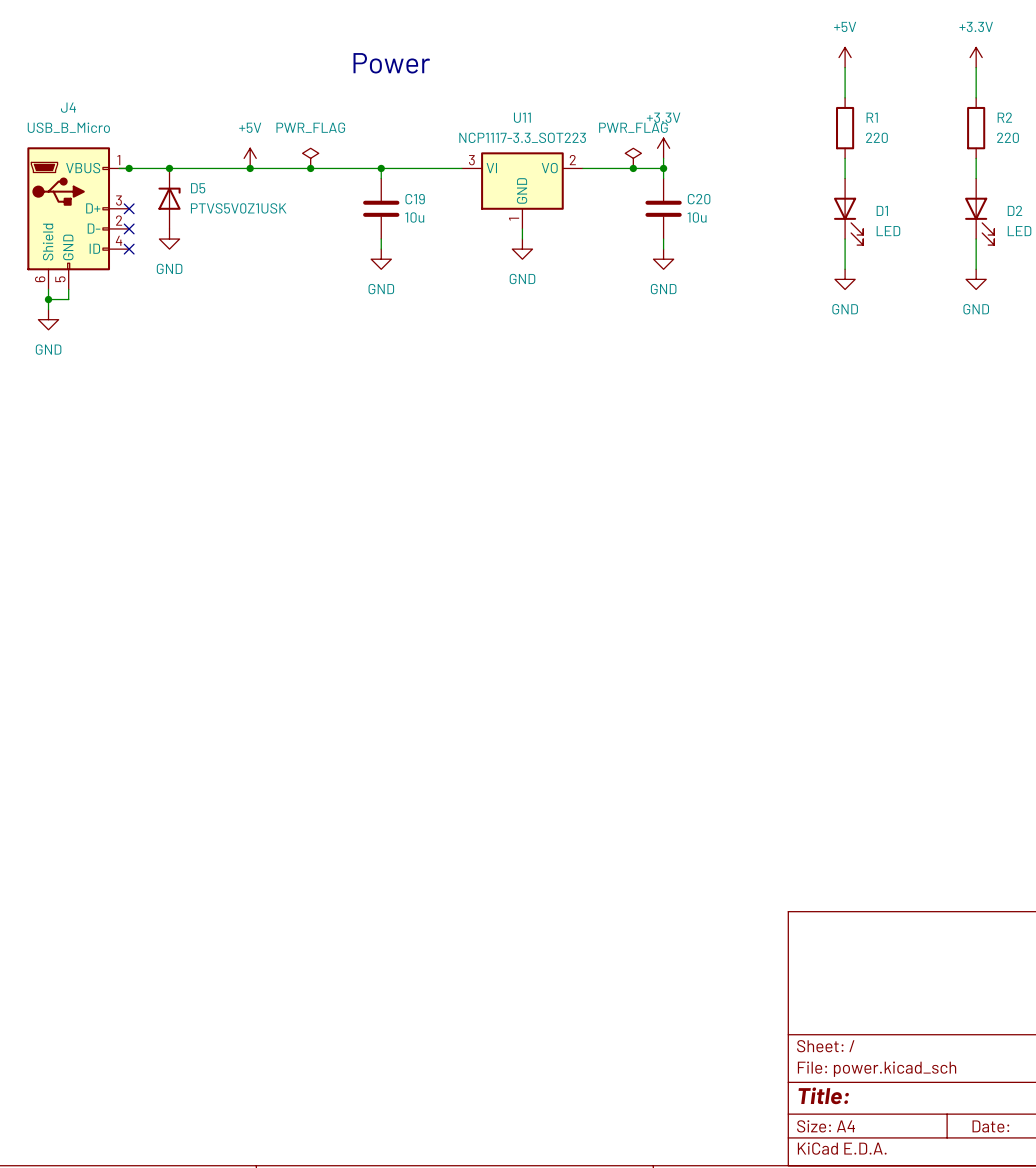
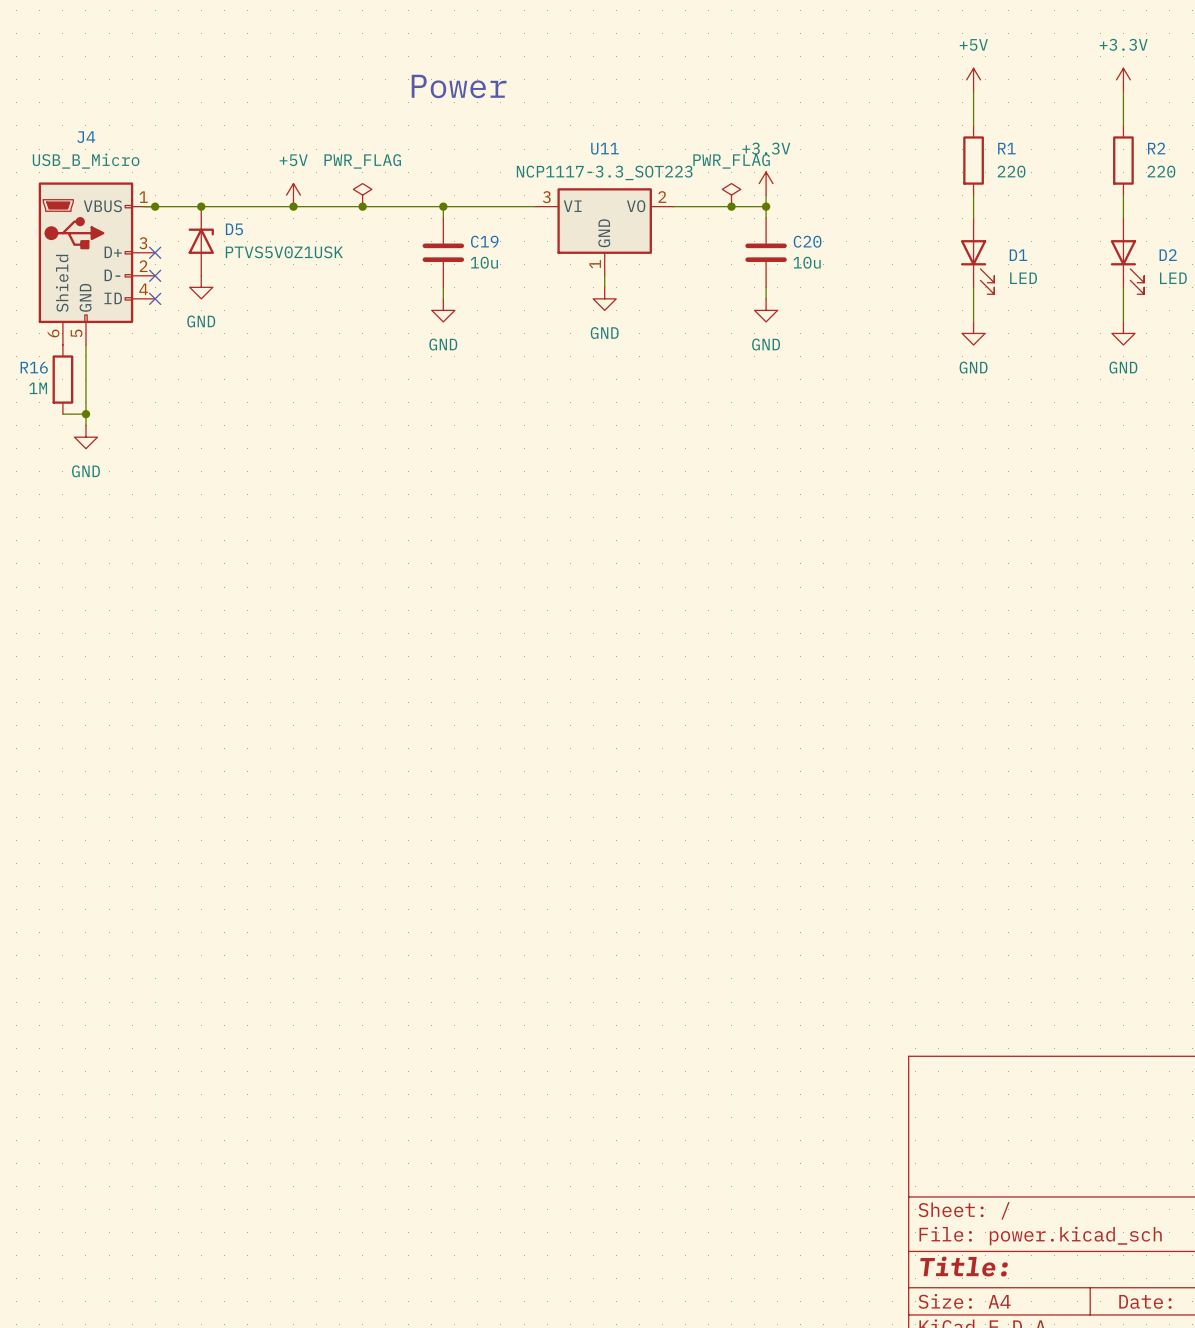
wire: (48, 299) (68, 299) -> (85, 425) (85, 356)
junction: (48, 299) -> none
power symbol position: GND (48, 319) -> GND (85, 437)
R16: none -> 1M (62, 379)
wire: none -> (62, 414) (85, 414)
junction: none -> (85, 414)

